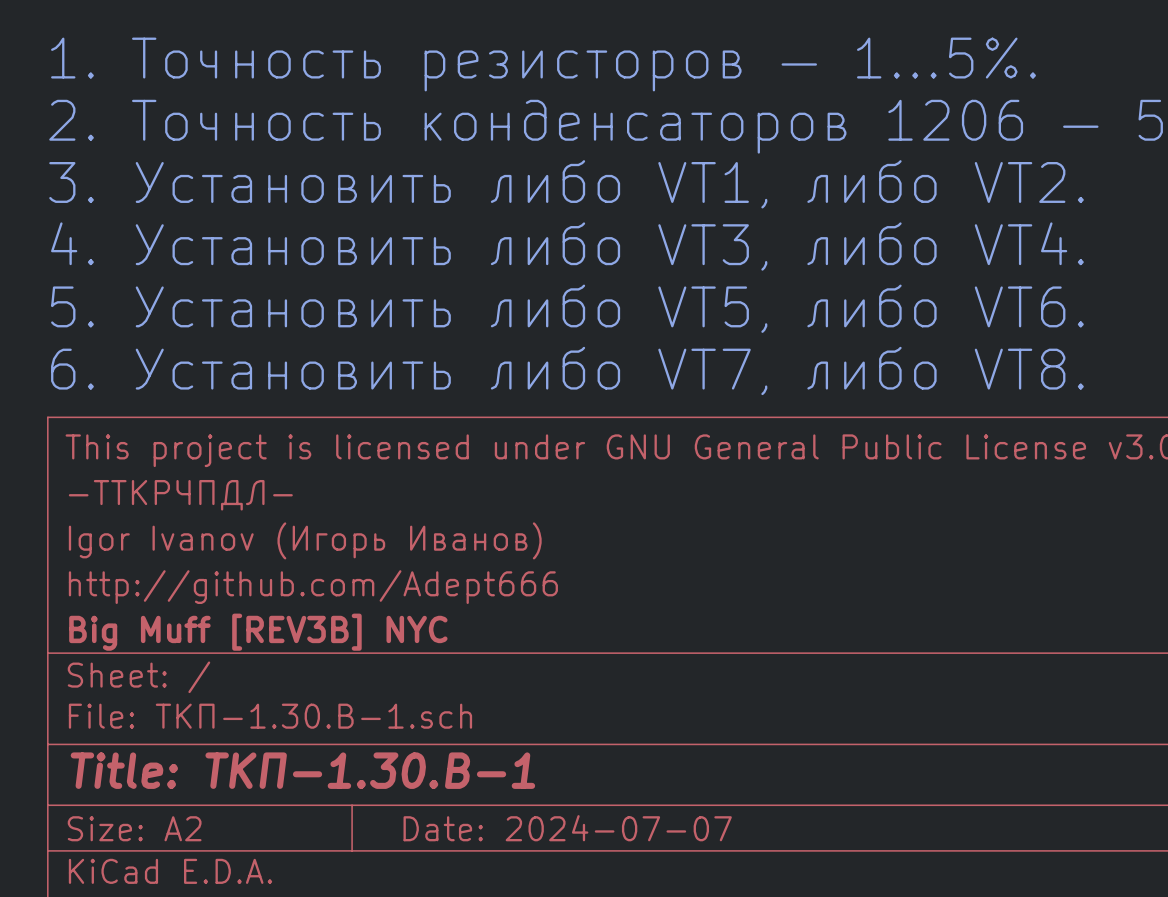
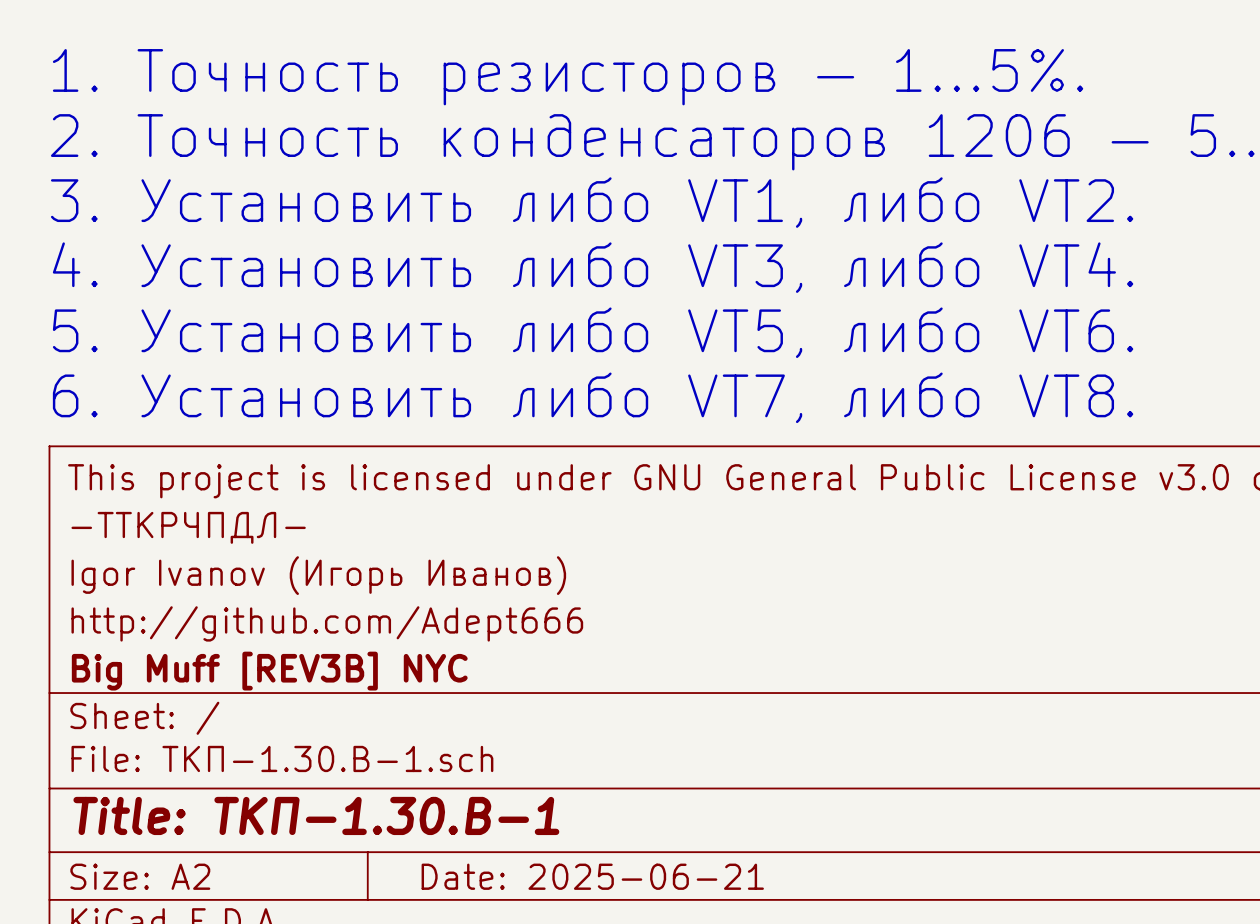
title block: Date: 2024-07-07 (567, 828) -> Date: 2025-06-21 (592, 876)

